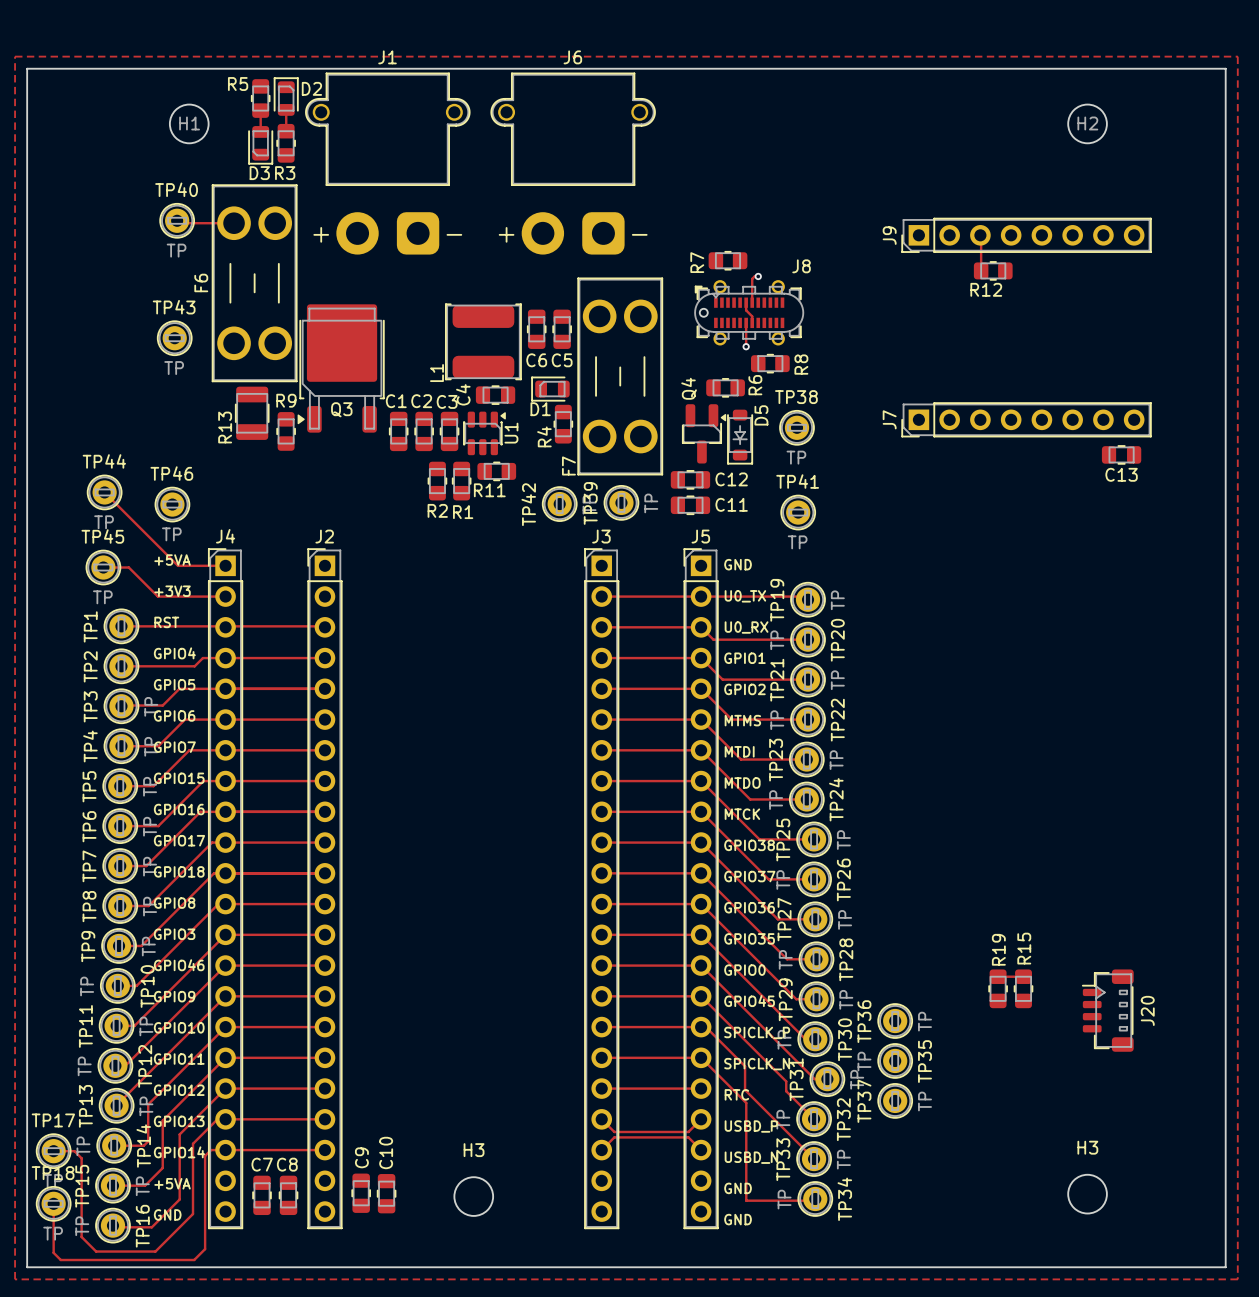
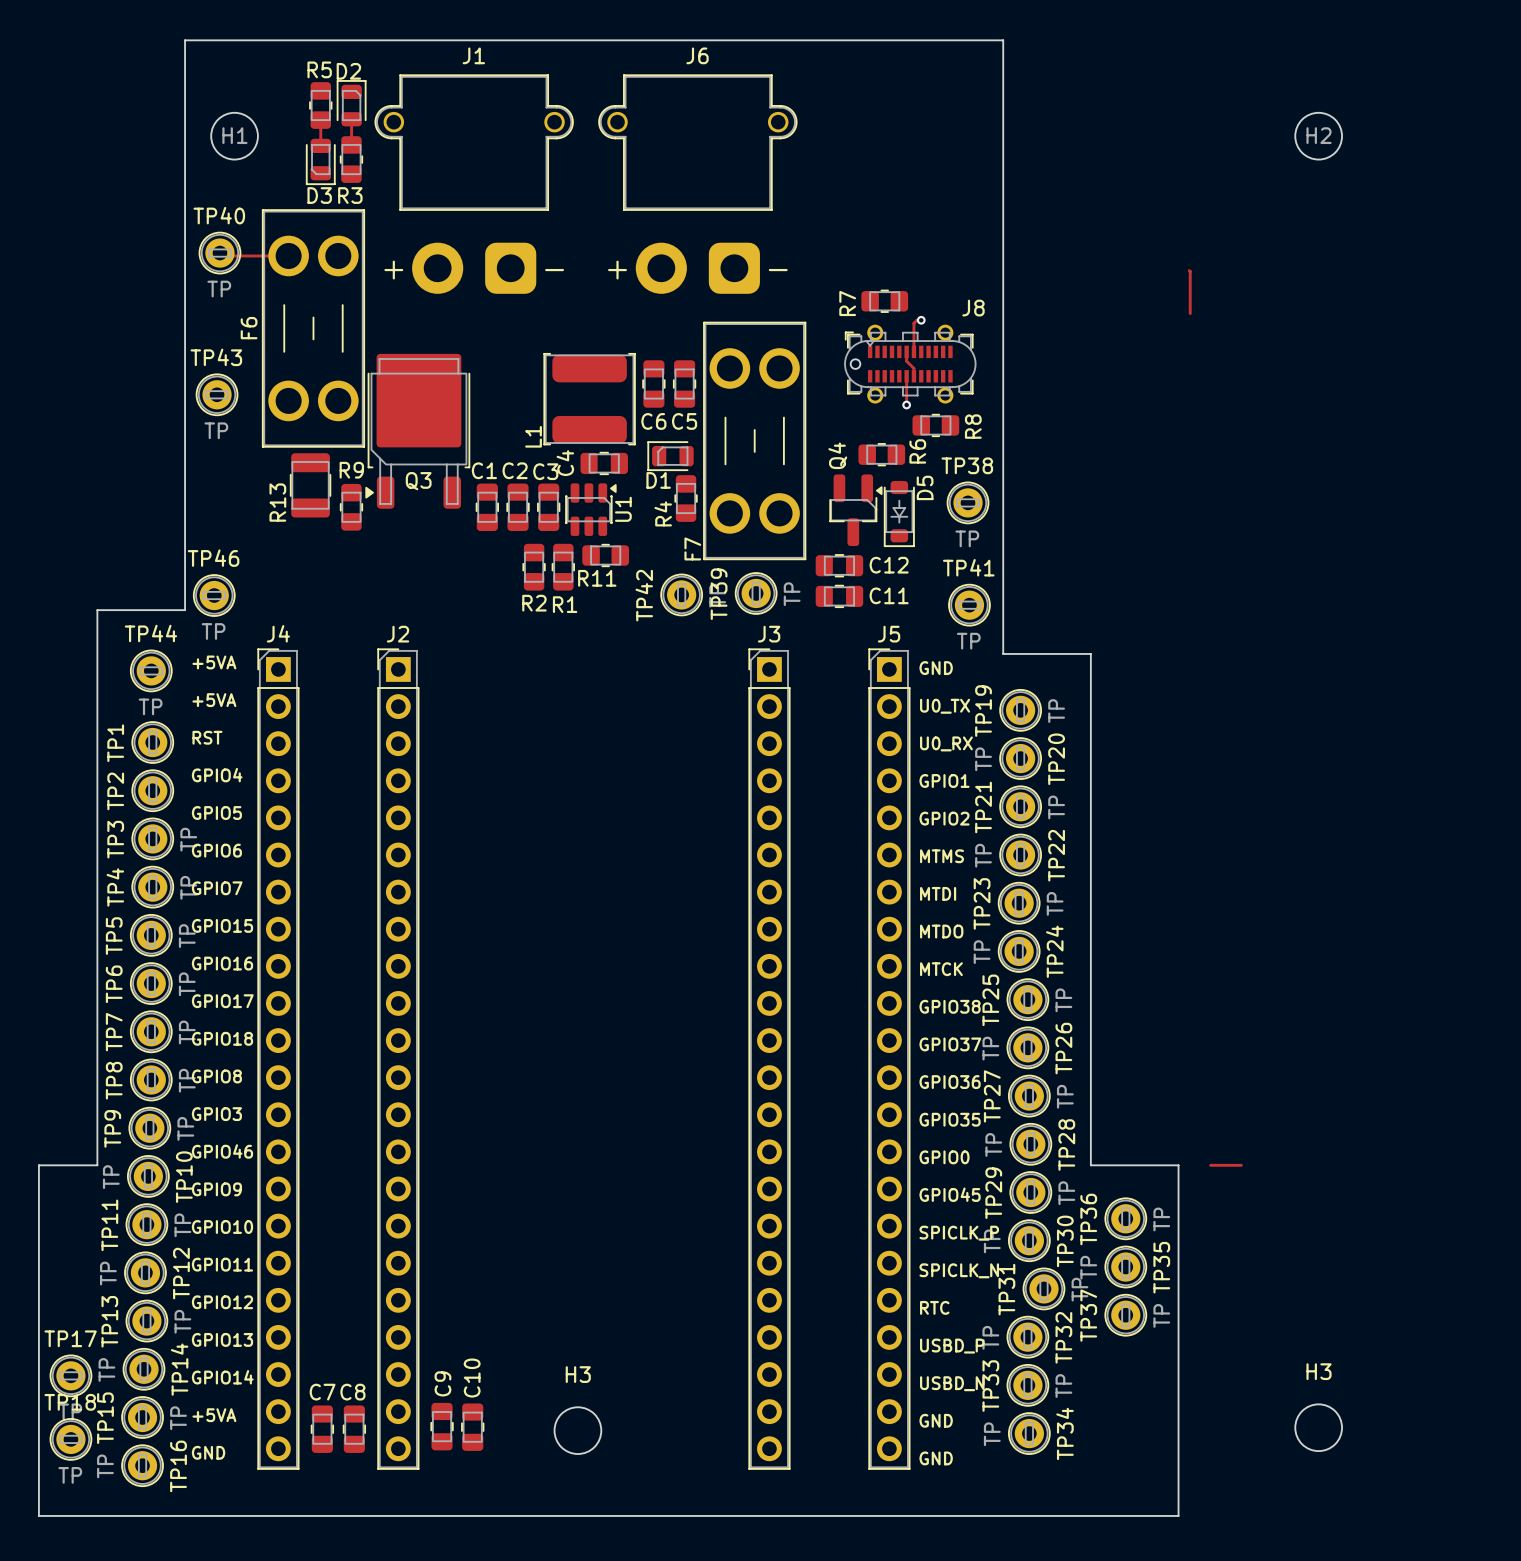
zone outline: (15, 56) (1237, 56) (1237, 1279) (15, 1279) (15, 56) -> none
R5 name position: R5 (238, 84) -> R5 (319, 69)
D2 name position: D2 (311, 88) -> D2 (348, 71)
J9: (1026, 235) -> none
R12: (993, 270) -> none
J7: (1026, 419) -> none
C13: (1121, 454) -> none
track: (104, 492) (177, 565) (225, 565) -> none
TP44 position: (104, 492) -> (151, 670)
text position: GND (738, 564) -> GND (936, 668)
track: (103, 567) (128, 567) (157, 596) (225, 596) -> none
TP45: TP (103, 567) -> none
text: +3V3 (172, 591) -> +5VA (214, 700)
track: (601, 596) (804, 596) (808, 599) -> none
text position: U0_TX (745, 596) -> U0_TX (945, 706)
TP19 position: (808, 599) -> (1020, 710)
track: (121, 626) (324, 627) -> none
track: (601, 627) (701, 627) (713, 639) (808, 639) -> none
text position: U0_RX (746, 627) -> U0_RX (946, 743)
TP20 position: (808, 639) -> (1020, 758)
track: (324, 658) (202, 658) (194, 666) (121, 666) -> none
track: (601, 658) (701, 658) (722, 679) (808, 679) -> none
text position: GPIO1 (744, 658) -> GPIO1 (944, 780)
TP21 position: (808, 679) -> (1020, 806)
track: (324, 688) (179, 688) (162, 705) (121, 706) -> none
track: (601, 688) (701, 688) (731, 719) (808, 719) -> none
text position: GPIO2 (744, 689) -> GPIO2 (944, 818)
track: (324, 719) (185, 719) (158, 746) (121, 746) -> none
track: (601, 719) (701, 719) (741, 759) (806, 759) -> none
TP22 position: (808, 719) -> (1020, 855)
text position: MTMS (742, 720) -> MTMS (941, 856)
track: (324, 750) (189, 750) (153, 786) (120, 786) -> none
track: (601, 750) (701, 750) (750, 799) (806, 799) -> none
text position: MTDI (739, 751) -> MTDI (938, 893)
TP23 position: (806, 759) -> (1019, 903)
track: (324, 781) (203, 781) (158, 826) (120, 826) -> none
track: (601, 781) (701, 781) (759, 839) (814, 839) -> none
text position: MTDO (742, 782) -> MTDO (941, 931)
TP24 position: (806, 799) -> (1019, 951)
track: (324, 811) (200, 811) (146, 866) (120, 866) -> none
track: (601, 811) (701, 811) (768, 879) (814, 879) -> none
text position: MTCK (742, 814) -> MTCK (941, 969)
TP25 position: (814, 839) -> (1027, 999)
track: (324, 842) (212, 842) (148, 906) (120, 906) -> none
track: (601, 842) (701, 842) (777, 919) (815, 919) -> none
text position: GPIO38 (749, 845) -> GPIO38 (950, 1006)
track: (324, 873) (214, 873) (141, 945) (119, 945) -> none
track: (601, 873) (701, 873) (787, 959) (816, 959) -> none
text position: GPIO37 (749, 876) -> GPIO37 (950, 1044)
TP26 position: (814, 879) -> (1027, 1047)
J3 position: (601, 888) -> (769, 1059)
J5 position: (701, 888) -> (889, 1059)
track: (324, 904) (218, 904) (136, 985) (117, 985) -> none
track: (601, 904) (701, 904) (796, 999) (816, 999) -> none
text position: GPIO36 (749, 907) -> GPIO36 (950, 1082)
TP27 position: (815, 919) -> (1029, 1096)
track: (324, 934) (225, 934) (134, 1025) (116, 1025) -> none
track: (601, 934) (701, 934) (805, 1039) (815, 1039) -> none
text position: GPIO35 (749, 938) -> GPIO35 (950, 1119)
TP28 position: (816, 959) -> (1030, 1144)
track: (324, 965) (225, 965) (125, 1065) (115, 1065) -> none
track: (601, 965) (701, 965) (814, 1079) (827, 1079) -> none
text position: GPIO0 (744, 970) -> GPIO0 (944, 1157)
board edge: (27, 976) (27, 68) (1225, 68) (1225, 1267) (971, 1267) -> (38, 1165) (97, 1165) (97, 610) (185, 610) (185, 40) (1003, 40) (1003, 653) (1090, 653) (1090, 1165) (1178, 1165) (1178, 1515)
R19: (998, 988) -> none
R15: (1023, 988) -> none
track: (324, 996) (225, 996) (116, 1105) -> none
track: (601, 996) (701, 996) (786, 1081) (786, 1091) (814, 1119) -> none
TP29 position: (816, 999) -> (1030, 1192)
text position: GPIO45 (749, 1001) -> GPIO45 (950, 1194)
J20: (1107, 1010) -> none
TP36 position: (895, 1021) -> (1125, 1218)
track: (324, 1027) (225, 1027) (148, 1104) (148, 1141) (143, 1145) (114, 1145) -> none
track: (601, 1027) (705, 1027) (745, 1066) (745, 1090) (814, 1159) -> none
text position: SPICLK_P (757, 1032) -> SPICLK_P (959, 1233)
TP30 position: (815, 1039) -> (1029, 1240)
track: (324, 1057) (225, 1057) (162, 1120) (162, 1168) (145, 1185) (112, 1185) -> none
track: (601, 1057) (701, 1057) (746, 1102) (746, 1200) (813, 1200) (815, 1198) -> none
TP35 position: (895, 1060) -> (1125, 1267)
text position: SPICLK_N (757, 1064) -> SPICLK_N (959, 1270)
TP31 position: (827, 1079) -> (1043, 1288)
track: (324, 1088) (225, 1088) (179, 1134) (179, 1199) (151, 1227) (114, 1227) (112, 1225) -> none
track: (601, 1088) (701, 1088) -> none
text position: RTC (736, 1094) -> RTC (934, 1307)
TP37 position: (895, 1100) -> (1125, 1315)
track: (324, 1119) (217, 1119) (193, 1143) (193, 1214) (155, 1251) (96, 1251) (81, 1237) (81, 1158) (74, 1151) (53, 1151) -> none
track: (601, 1119) (614, 1131) (688, 1131) (701, 1119) -> none
TP32 position: (814, 1119) -> (1027, 1337)
text position: USBD_P (751, 1126) -> USBD_P (952, 1346)
track: (324, 1150) (210, 1150) (205, 1155) (205, 1249) (194, 1260) (60, 1260) (53, 1252) (53, 1203) -> none
track: (601, 1150) (614, 1137) (688, 1137) (701, 1150) -> none
text position: USBD_N (751, 1157) -> USBD_N (952, 1383)
TP33 position: (814, 1159) -> (1027, 1385)
text position: GND (738, 1188) -> GND (936, 1420)
TP34 position: (815, 1198) -> (1029, 1433)
text position: GND (738, 1219) -> GND (936, 1458)

